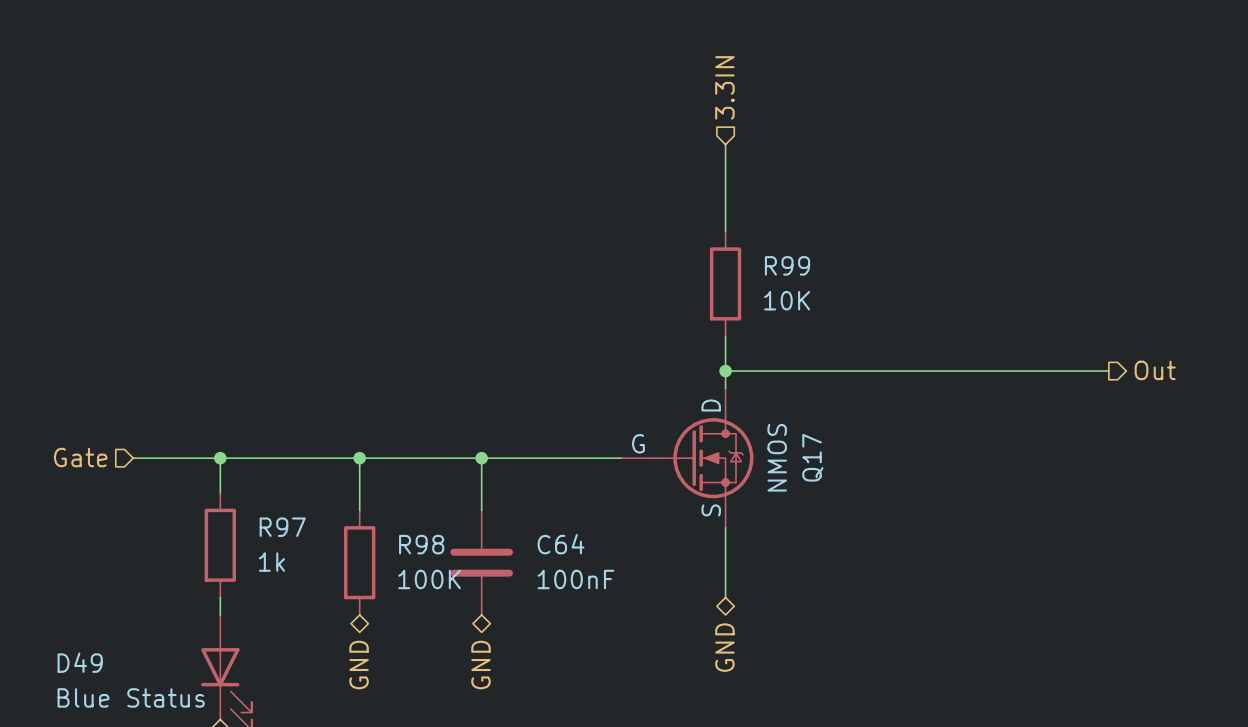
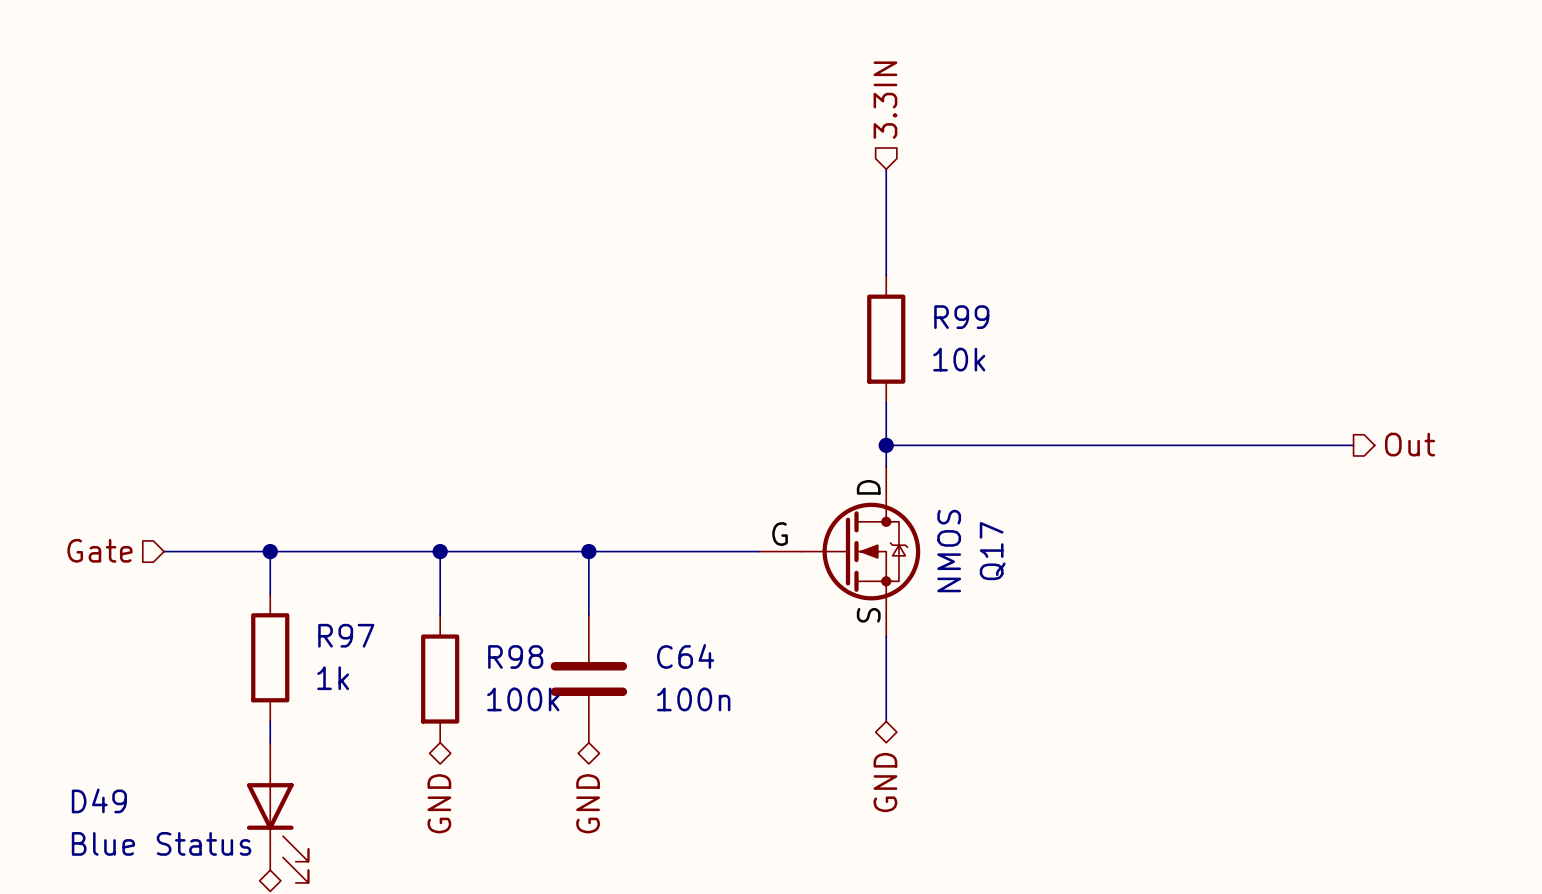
R99 value: 10K (787, 300) -> 10k (959, 359)
R98 value: 100K (429, 579) -> 100k (523, 699)
C64 value: 100nF (575, 579) -> 100n (693, 699)

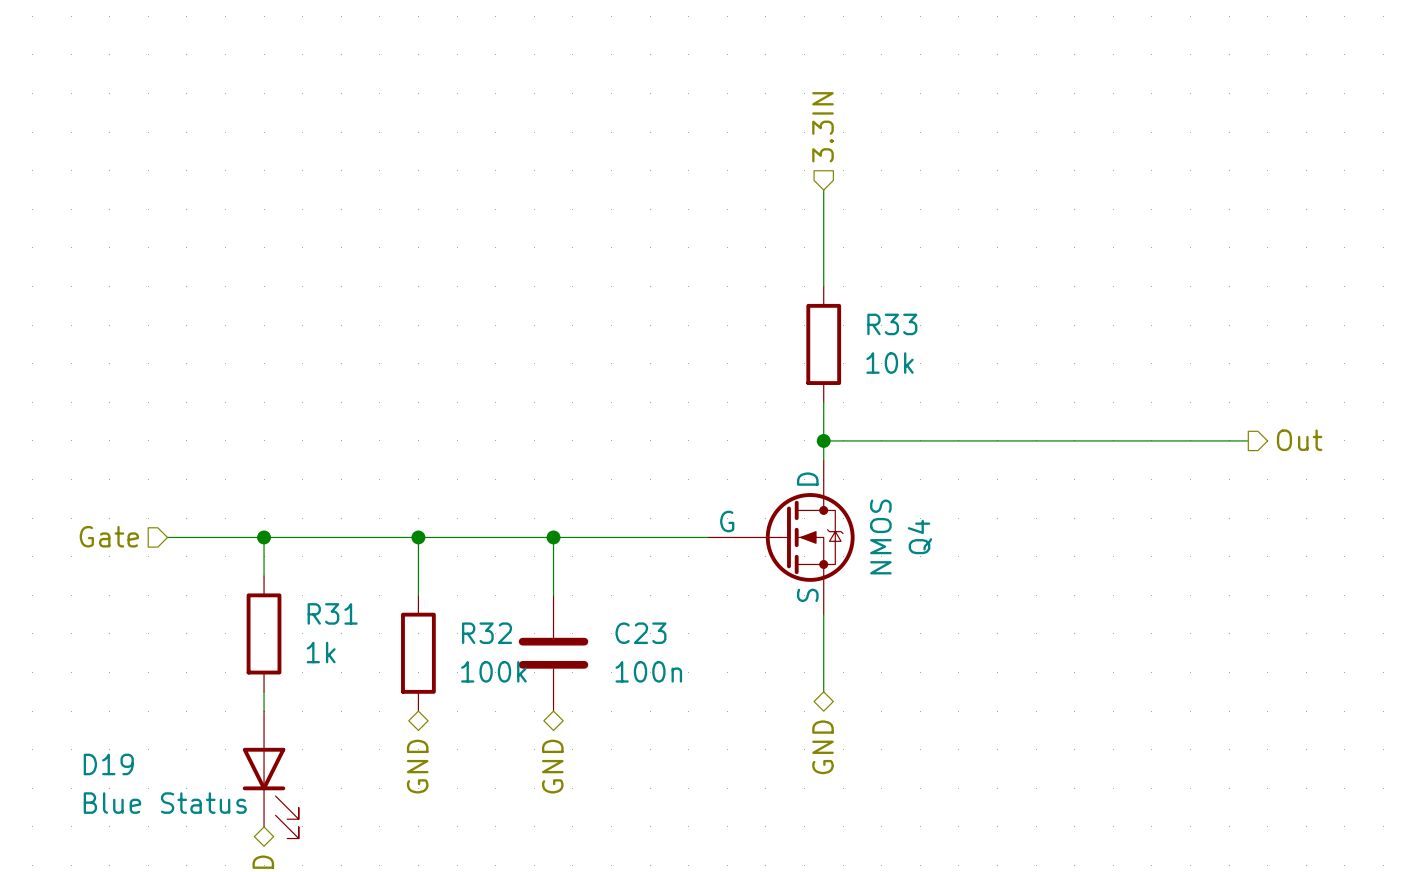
R99 name: R99 (961, 317) -> R33 (892, 324)
Q17 name: Q17 (992, 551) -> Q4 (919, 536)
R97 name: R97 (346, 635) -> R31 (332, 613)
R98 name: R98 (515, 656) -> R32 (487, 633)
C64 name: C64 (685, 656) -> C23 (640, 633)
D49 name: D49 (99, 800) -> D19 (108, 764)

